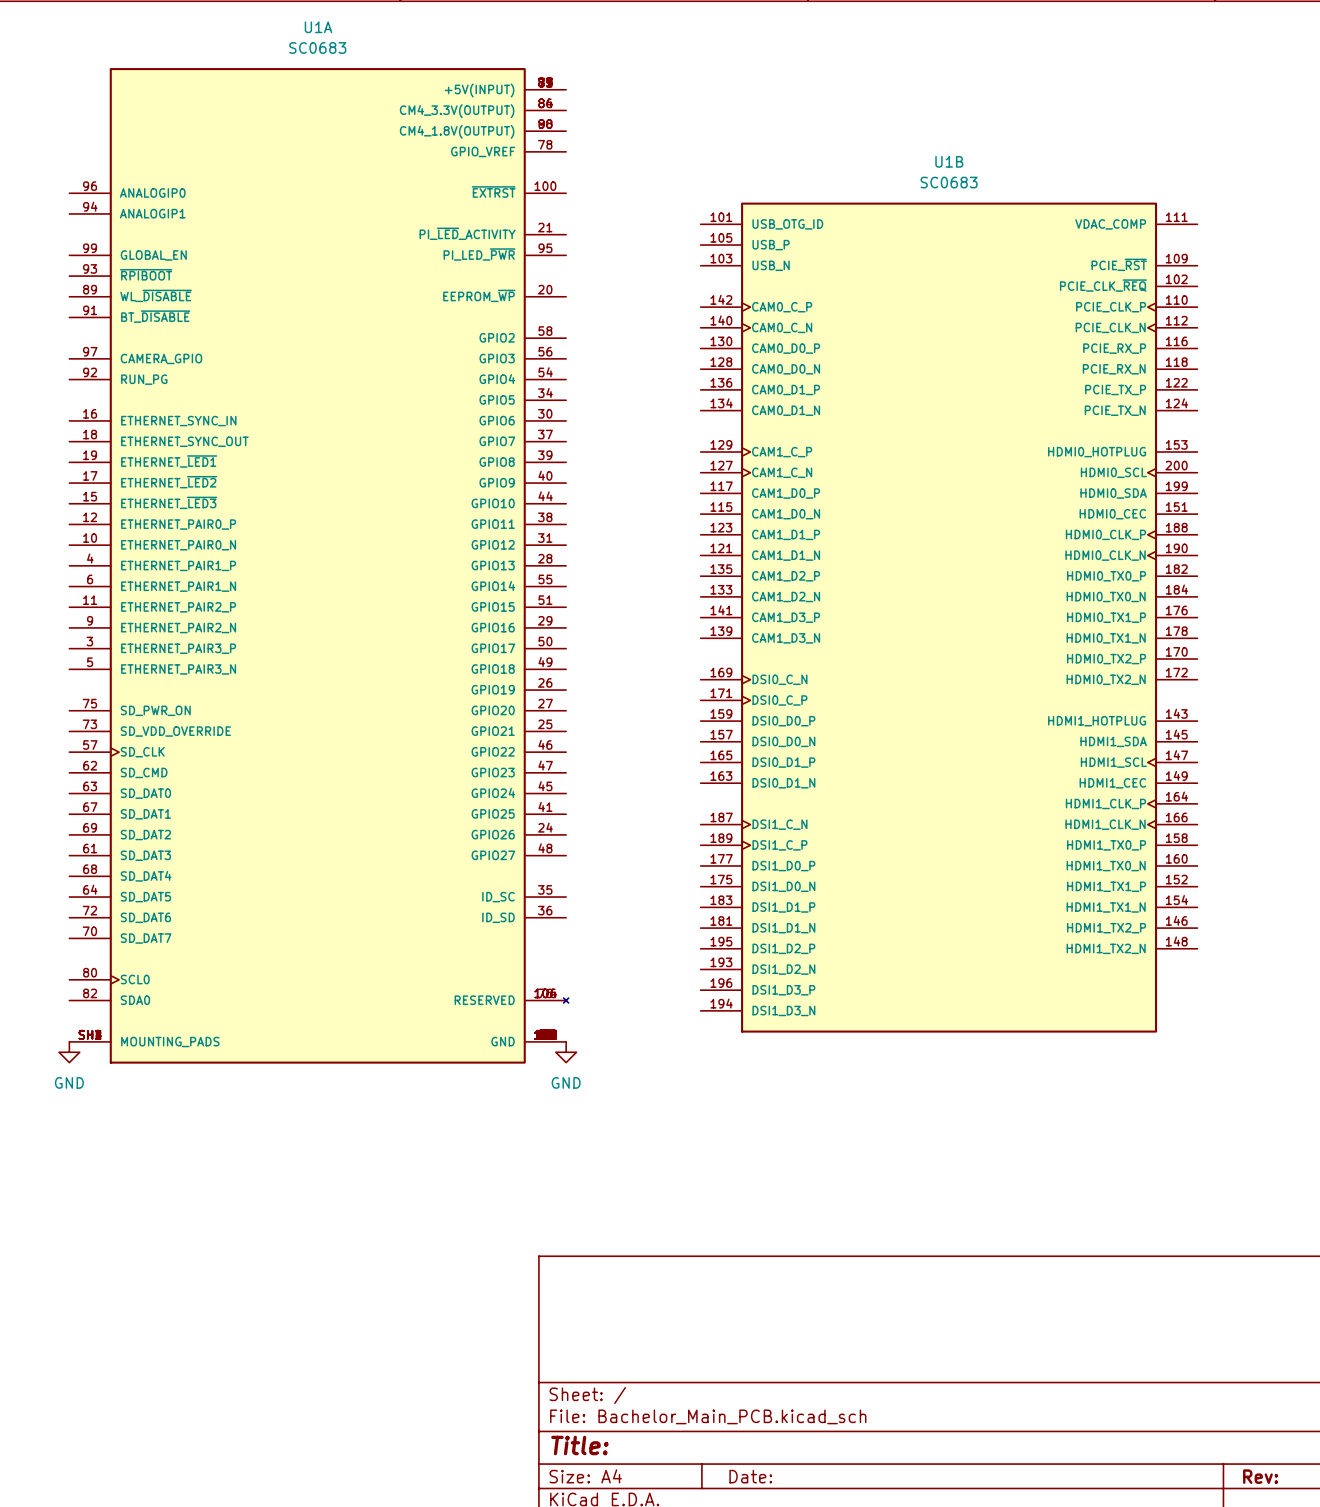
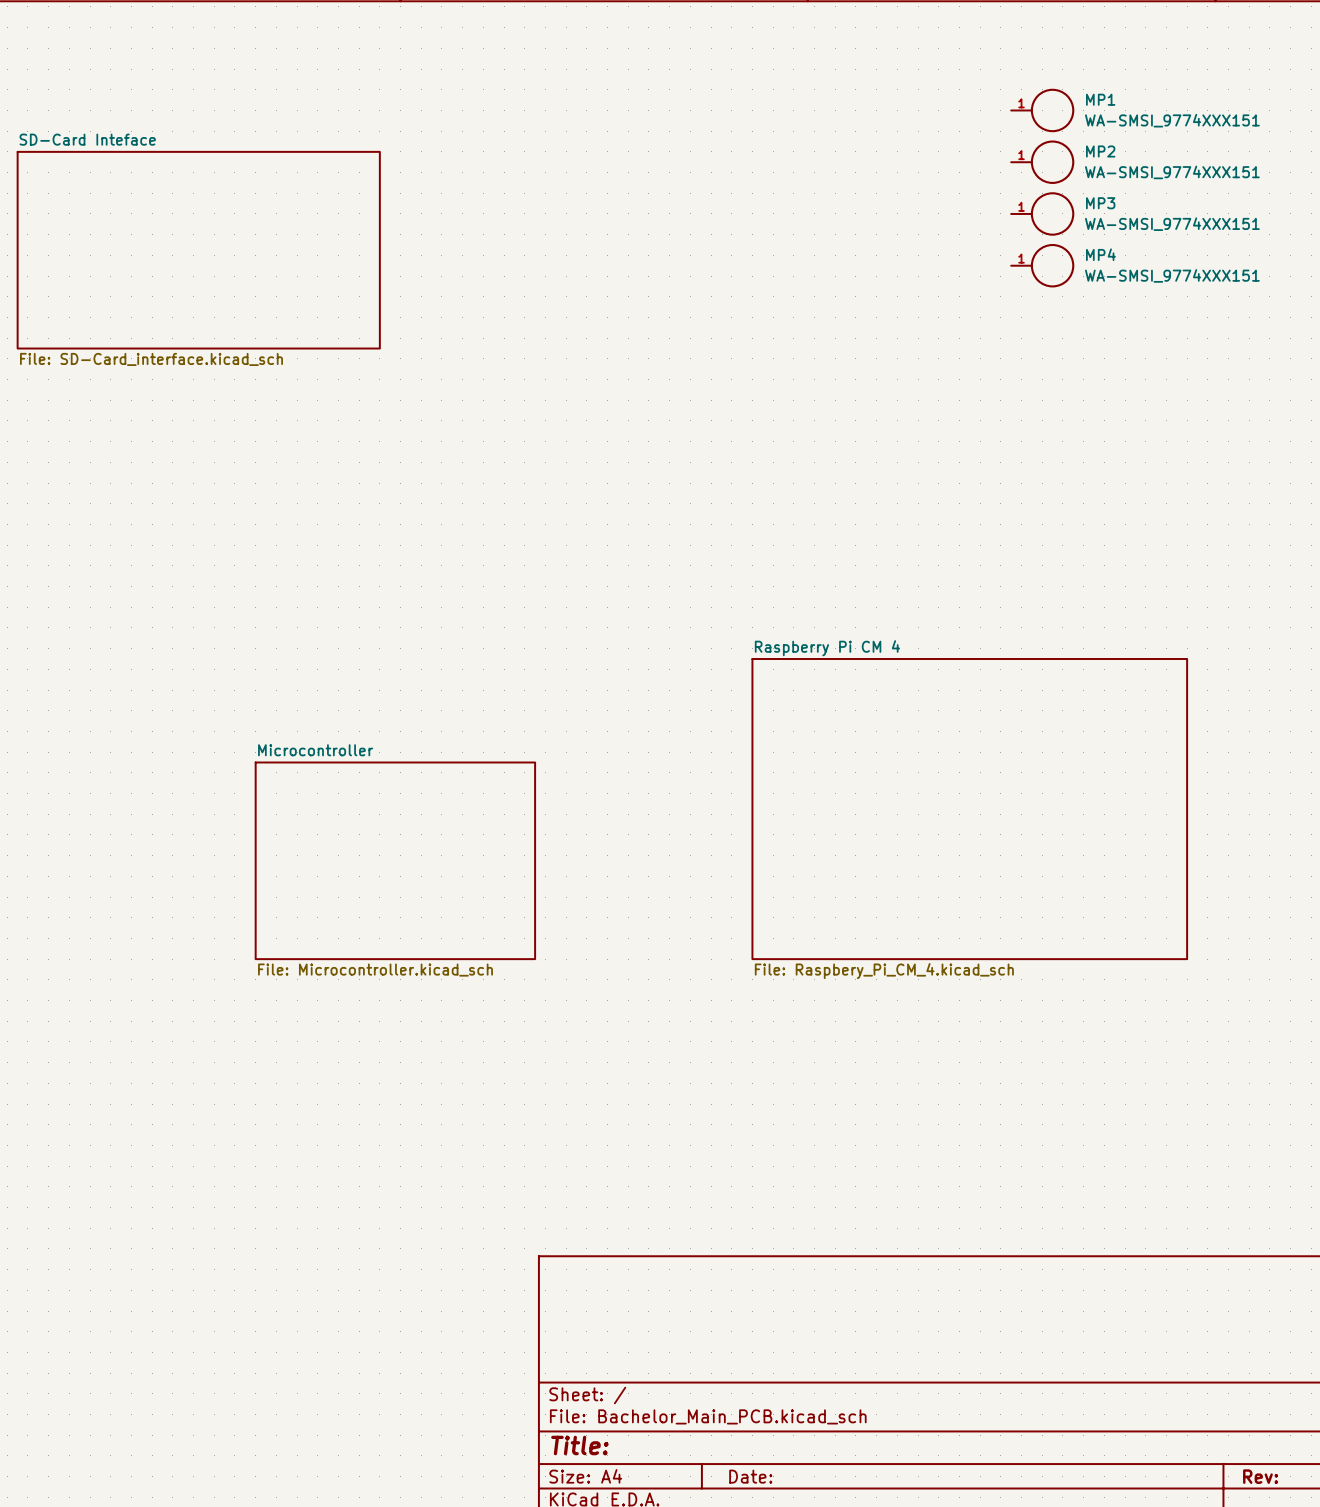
MP1: none -> WA-SMSI_9774XXX151 (1042, 110)
MP2: none -> WA-SMSI_9774XXX151 (1042, 162)
MP3: none -> WA-SMSI_9774XXX151 (1042, 213)
sheet SD-Card Inteface: none -> File: SD-Card_interface.kicad_sch (198, 250)
MP4: none -> WA-SMSI_9774XXX151 (1042, 265)
U1A: SC0683 (318, 565) -> none
U1B: SC0683 (949, 617) -> none
sheet Raspberry Pi CM 4: none -> File: Raspbery_Pi_CM_4.kicad_sch (969, 809)
sheet Microcontroller: none -> File: Microcontroller.kicad_sch (395, 860)
power symbol: GND (69, 1052) -> none
power symbol: GND (566, 1052) -> none

